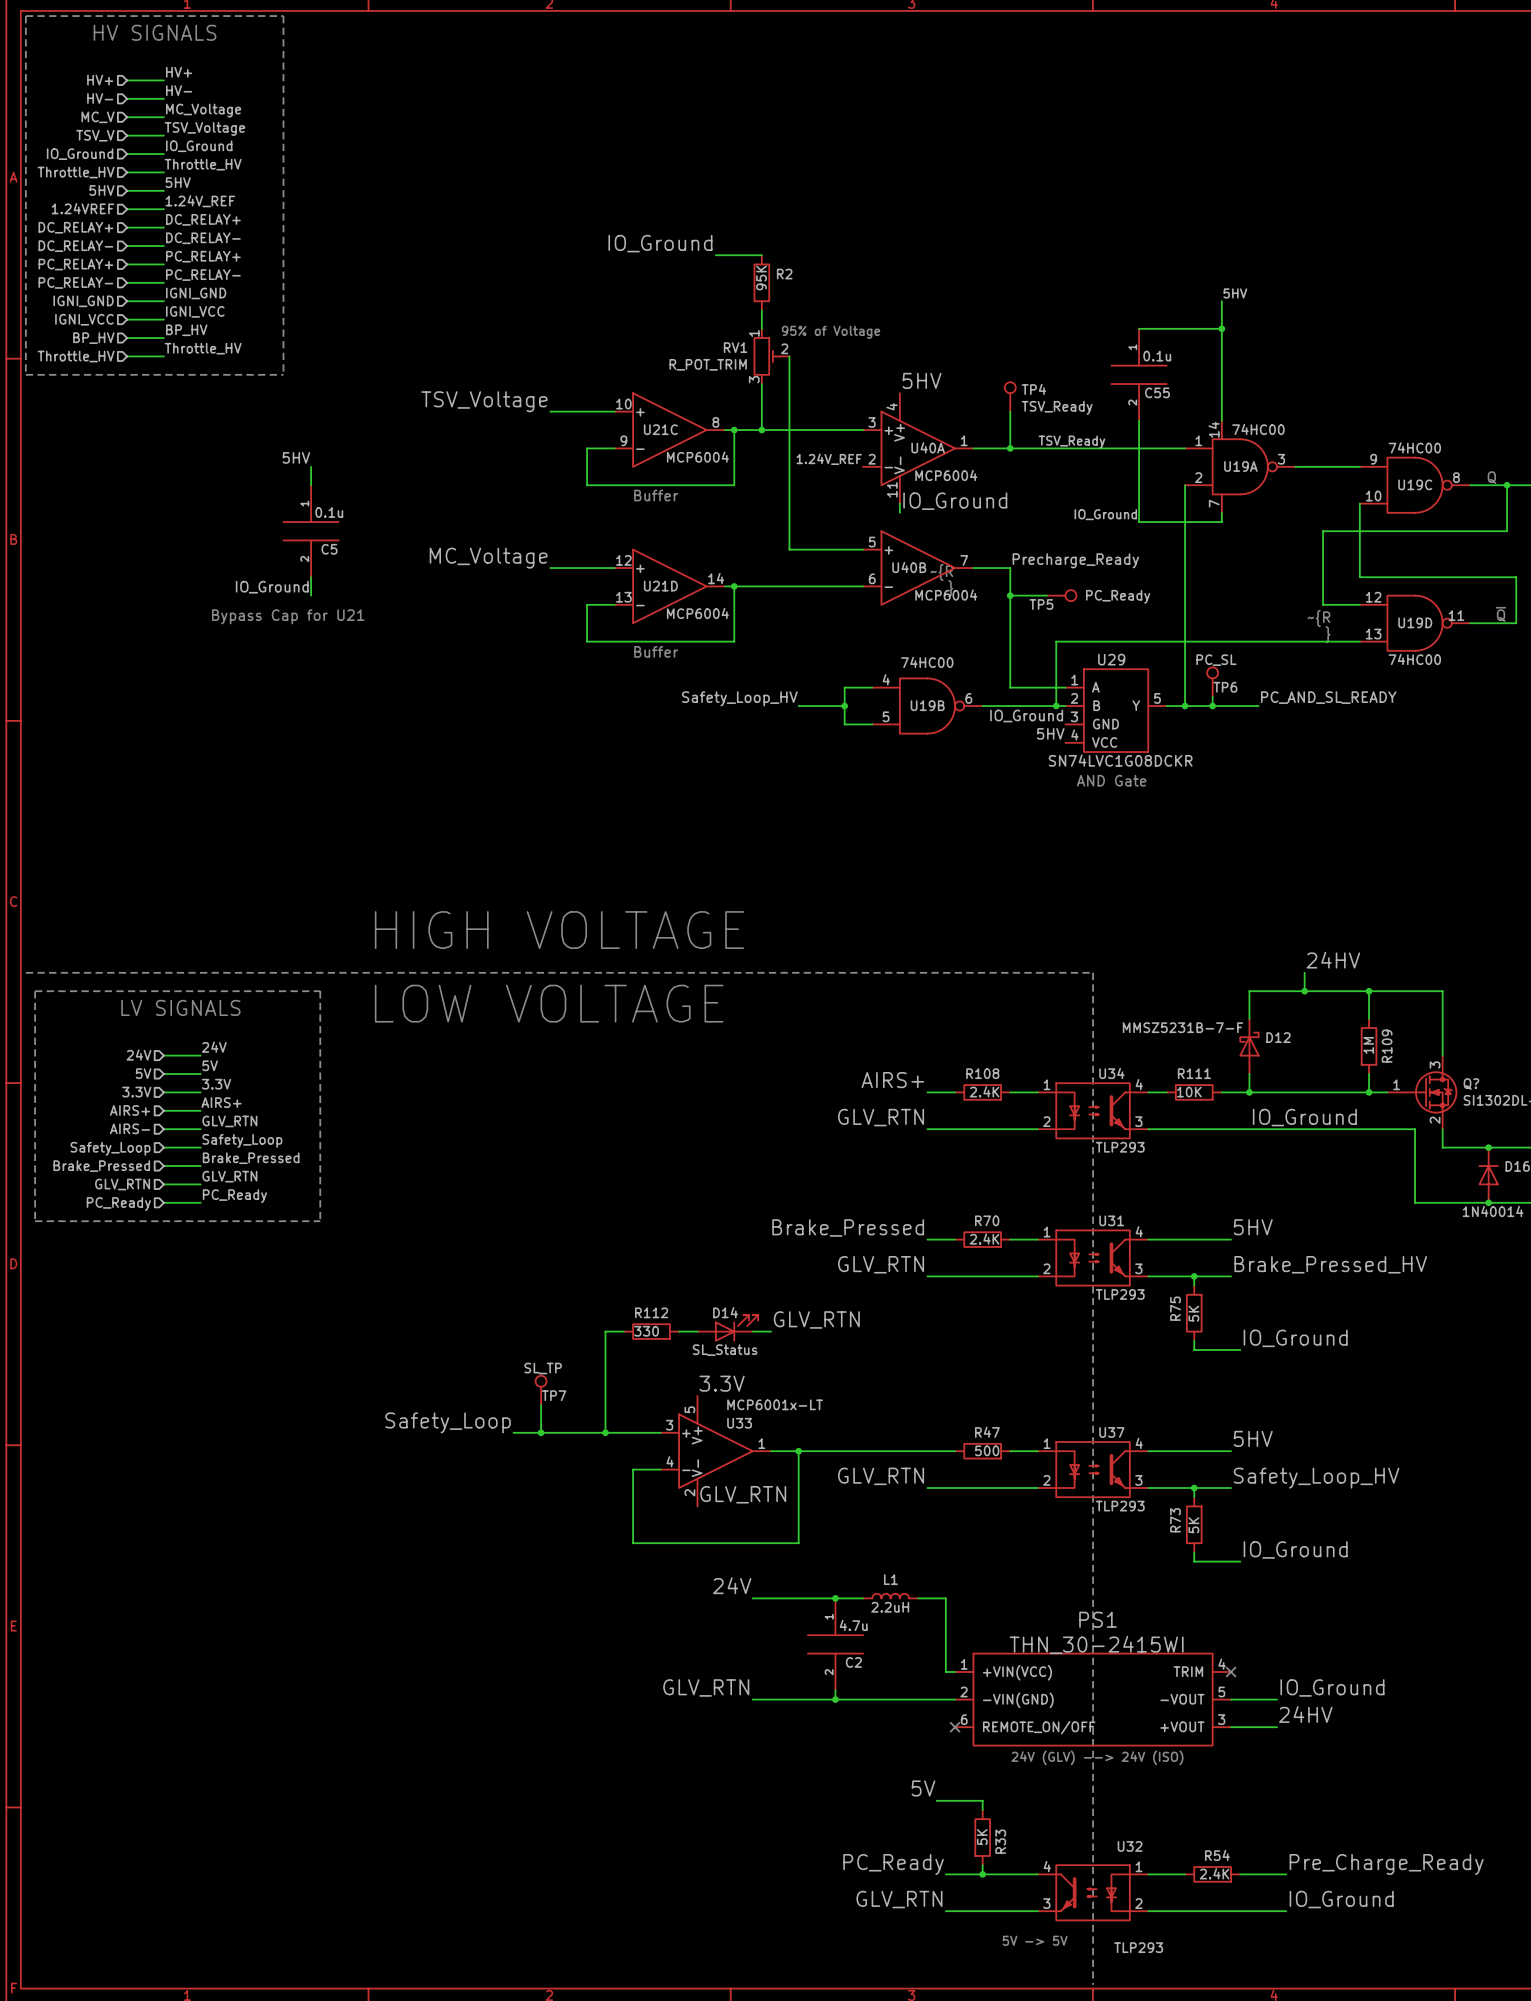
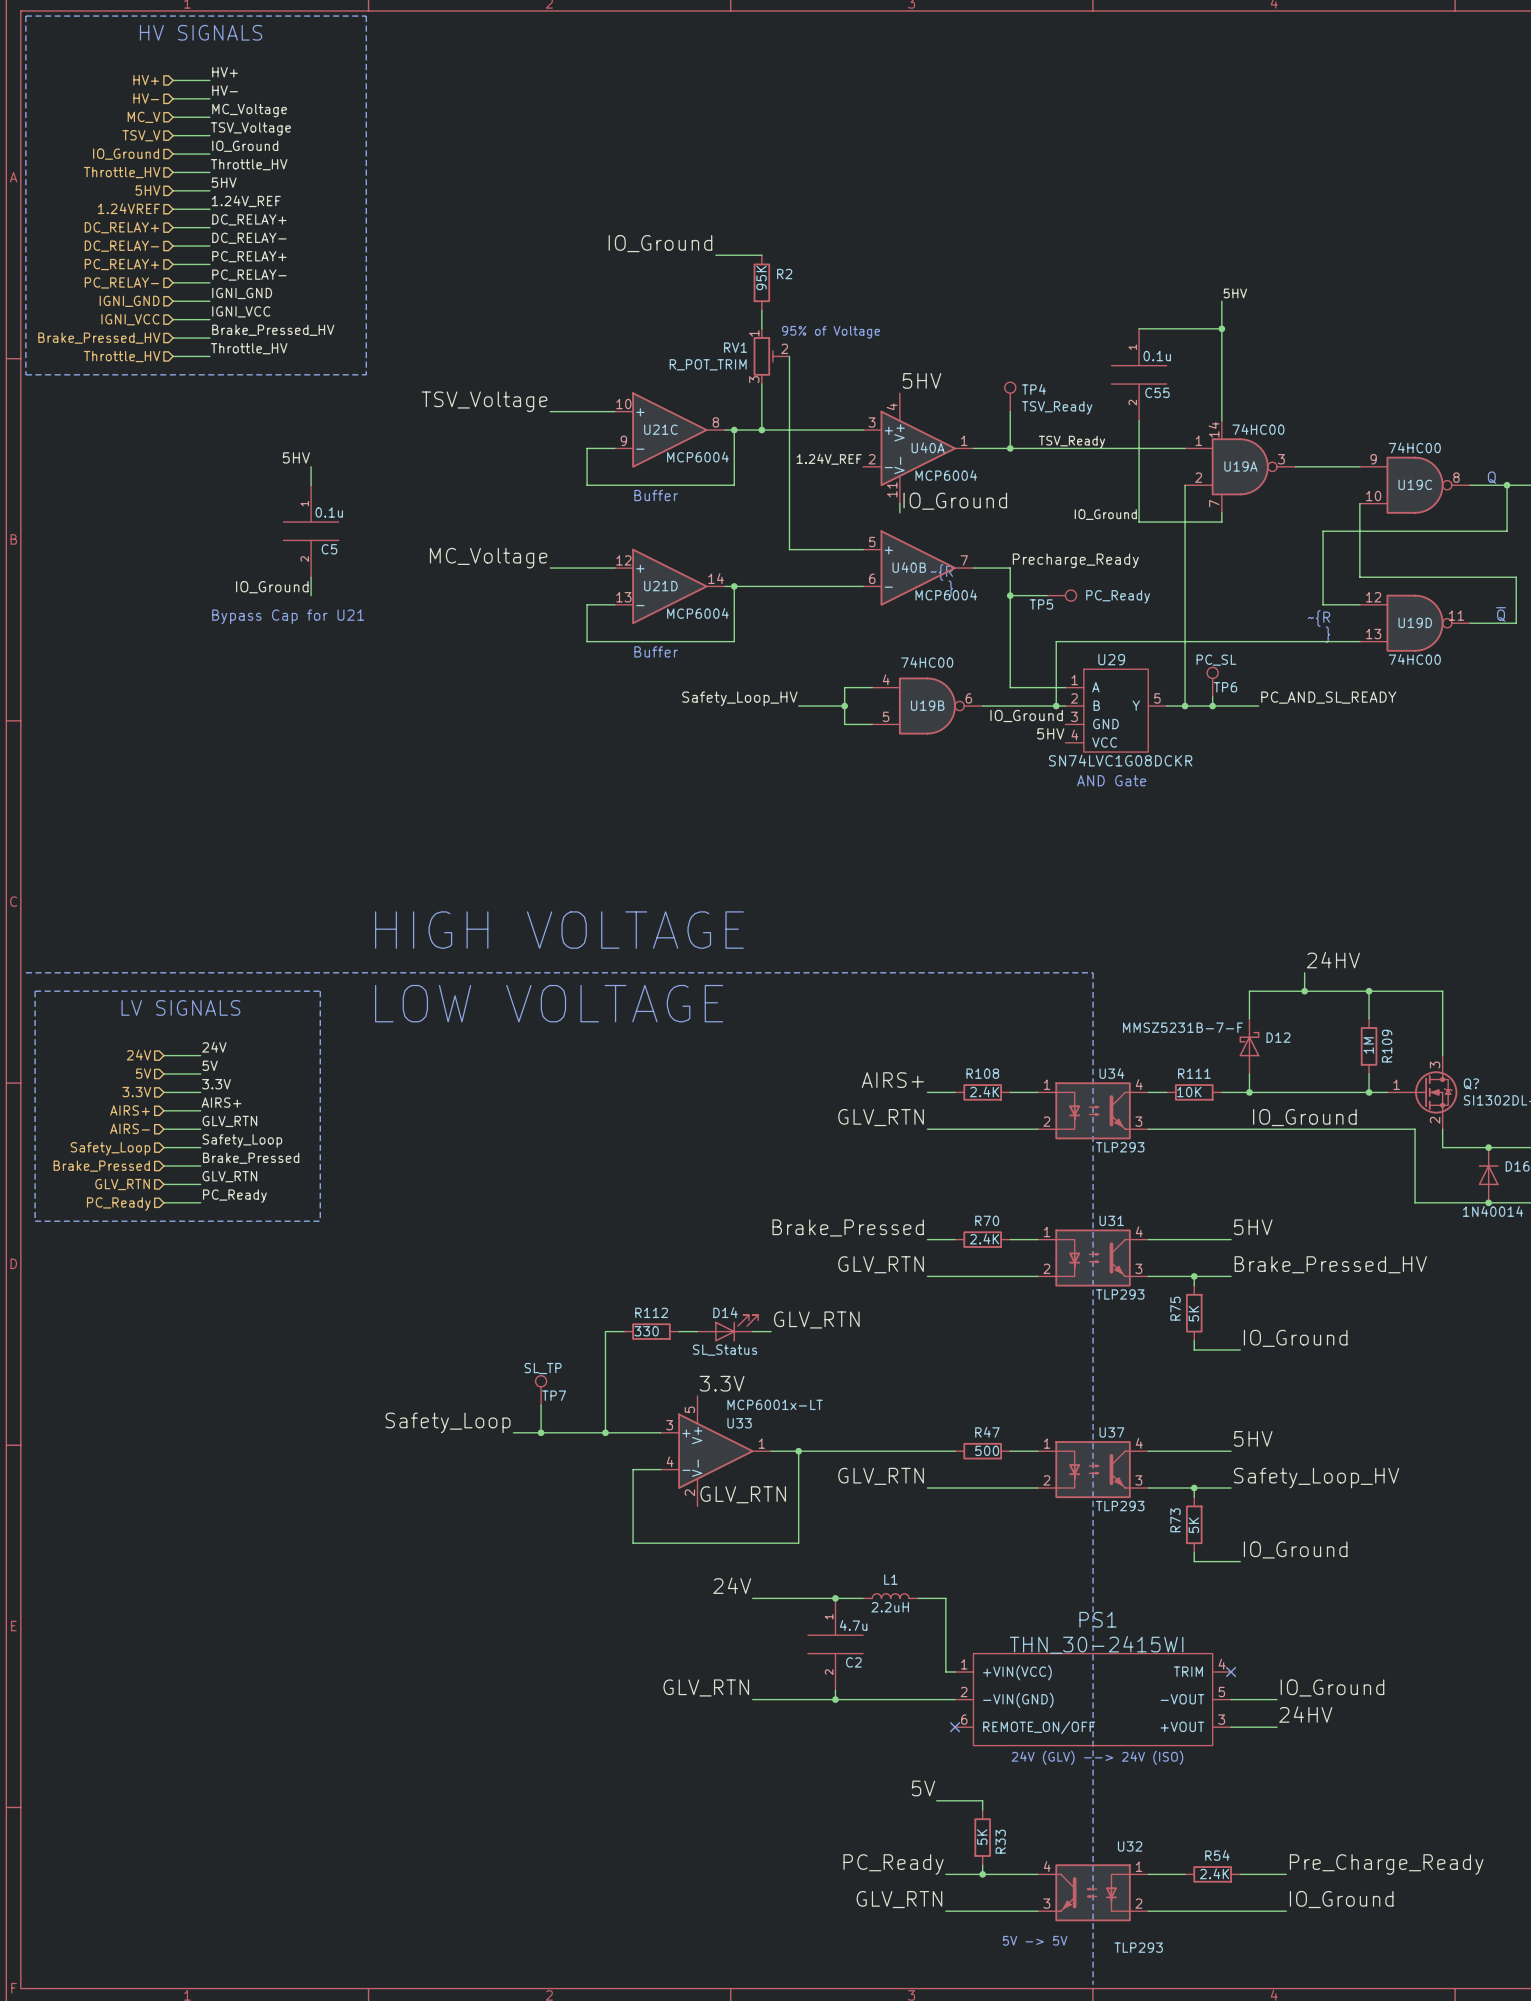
line: (283, 16) (283, 374) -> (283, 16) (366, 16) (366, 374) (283, 374)
text position: HV SIGNALS (155, 32) -> HV SIGNALS (201, 32)
label position: HV+ (179, 72) -> HV+ (225, 72)
hierarchical label position: HV+ (100, 80) -> HV+ (146, 80)
wire: (127, 80) (163, 80) -> (173, 80) (209, 80)
label position: HV- (179, 90) -> HV- (225, 90)
hierarchical label position: HV- (100, 98) -> HV- (146, 98)
wire: (127, 98) (163, 98) -> (173, 98) (209, 98)
label position: MC_Voltage (203, 110) -> MC_Voltage (249, 110)
hierarchical label position: MC_V (98, 117) -> MC_V (144, 117)
wire: (127, 117) (163, 117) -> (173, 117) (209, 117)
label position: TSV_Voltage (204, 128) -> TSV_Voltage (250, 128)
hierarchical label position: TSV_V (95, 135) -> TSV_V (141, 135)
wire: (127, 135) (163, 135) -> (173, 135) (209, 135)
label position: IO_Ground (199, 146) -> IO_Ground (245, 146)
hierarchical label position: IO_Ground (80, 154) -> IO_Ground (126, 154)
wire: (127, 154) (163, 154) -> (173, 154) (209, 154)
label position: Throttle_HV (203, 164) -> Throttle_HV (249, 164)
hierarchical label position: Throttle_HV (76, 172) -> Throttle_HV (122, 172)
wire: (127, 172) (163, 172) -> (173, 172) (209, 172)
label position: 5HV (178, 182) -> 5HV (224, 182)
hierarchical label position: 5HV (101, 190) -> 5HV (147, 190)
wire: (127, 190) (163, 190) -> (173, 190) (209, 190)
label position: 1.24V_REF (200, 201) -> 1.24V_REF (246, 201)
hierarchical label position: 1.24VREF (82, 208) -> 1.24VREF (128, 208)
wire: (127, 209) (163, 209) -> (173, 209) (209, 209)
label position: DC_RELAY+ (203, 219) -> DC_RELAY+ (249, 219)
hierarchical label position: DC_RELAY+ (75, 227) -> DC_RELAY+ (121, 227)
wire: (127, 227) (163, 227) -> (173, 227) (209, 227)
label position: DC_RELAY- (203, 238) -> DC_RELAY- (249, 238)
hierarchical label position: DC_RELAY- (75, 246) -> DC_RELAY- (121, 246)
wire: (127, 246) (163, 246) -> (173, 246) (209, 246)
label position: PC_RELAY+ (203, 256) -> PC_RELAY+ (249, 256)
hierarchical label position: PC_RELAY+ (75, 264) -> PC_RELAY+ (121, 264)
wire: (127, 264) (163, 264) -> (173, 264) (209, 264)
label position: PC_RELAY- (203, 275) -> PC_RELAY- (249, 275)
hierarchical label position: PC_RELAY- (75, 282) -> PC_RELAY- (121, 282)
wire: (127, 282) (163, 282) -> (173, 282) (209, 282)
label position: IGNI_GND (196, 293) -> IGNI_GND (242, 293)
hierarchical label position: IGNI_GND (83, 301) -> IGNI_GND (129, 301)
wire: (127, 301) (163, 301) -> (173, 301) (209, 301)
label position: IGNI_VCC (195, 311) -> IGNI_VCC (241, 311)
hierarchical label position: IGNI_VCC (84, 319) -> IGNI_VCC (130, 319)
wire: (127, 319) (163, 319) -> (173, 319) (209, 319)
label: BP_HV (186, 330) -> none
label: none -> Brake_Pressed_HV (273, 330)
hierarchical label: BP_HV (93, 338) -> none
hierarchical label: none -> Brake_Pressed_HV (99, 338)
wire: (127, 338) (163, 338) -> (173, 338) (209, 338)
label position: Throttle_HV (203, 348) -> Throttle_HV (249, 348)
hierarchical label position: Throttle_HV (76, 356) -> Throttle_HV (122, 356)
wire: (127, 356) (163, 356) -> (173, 356) (209, 356)

